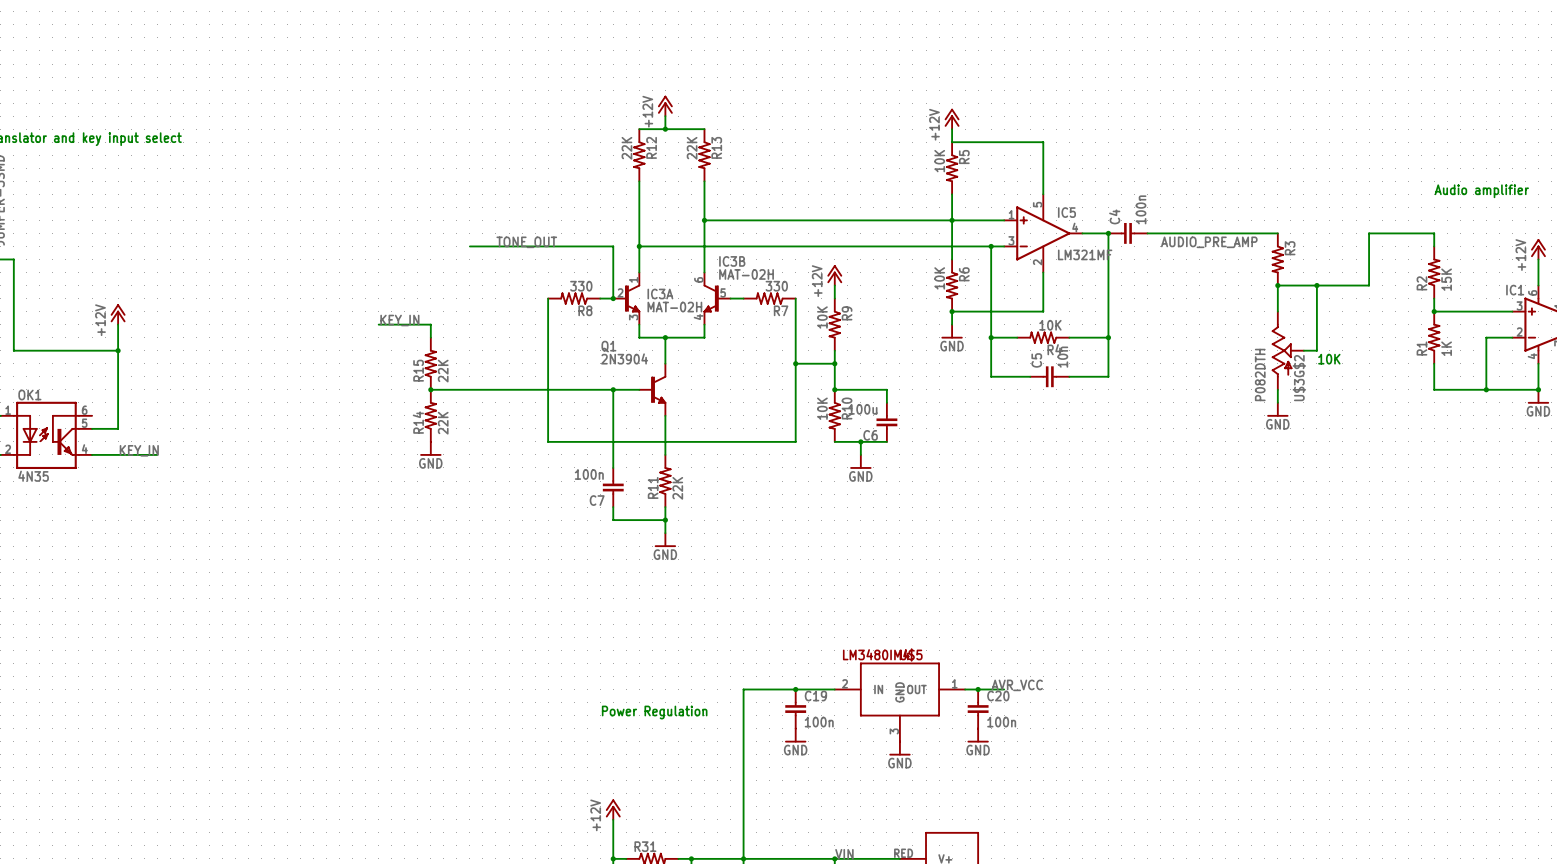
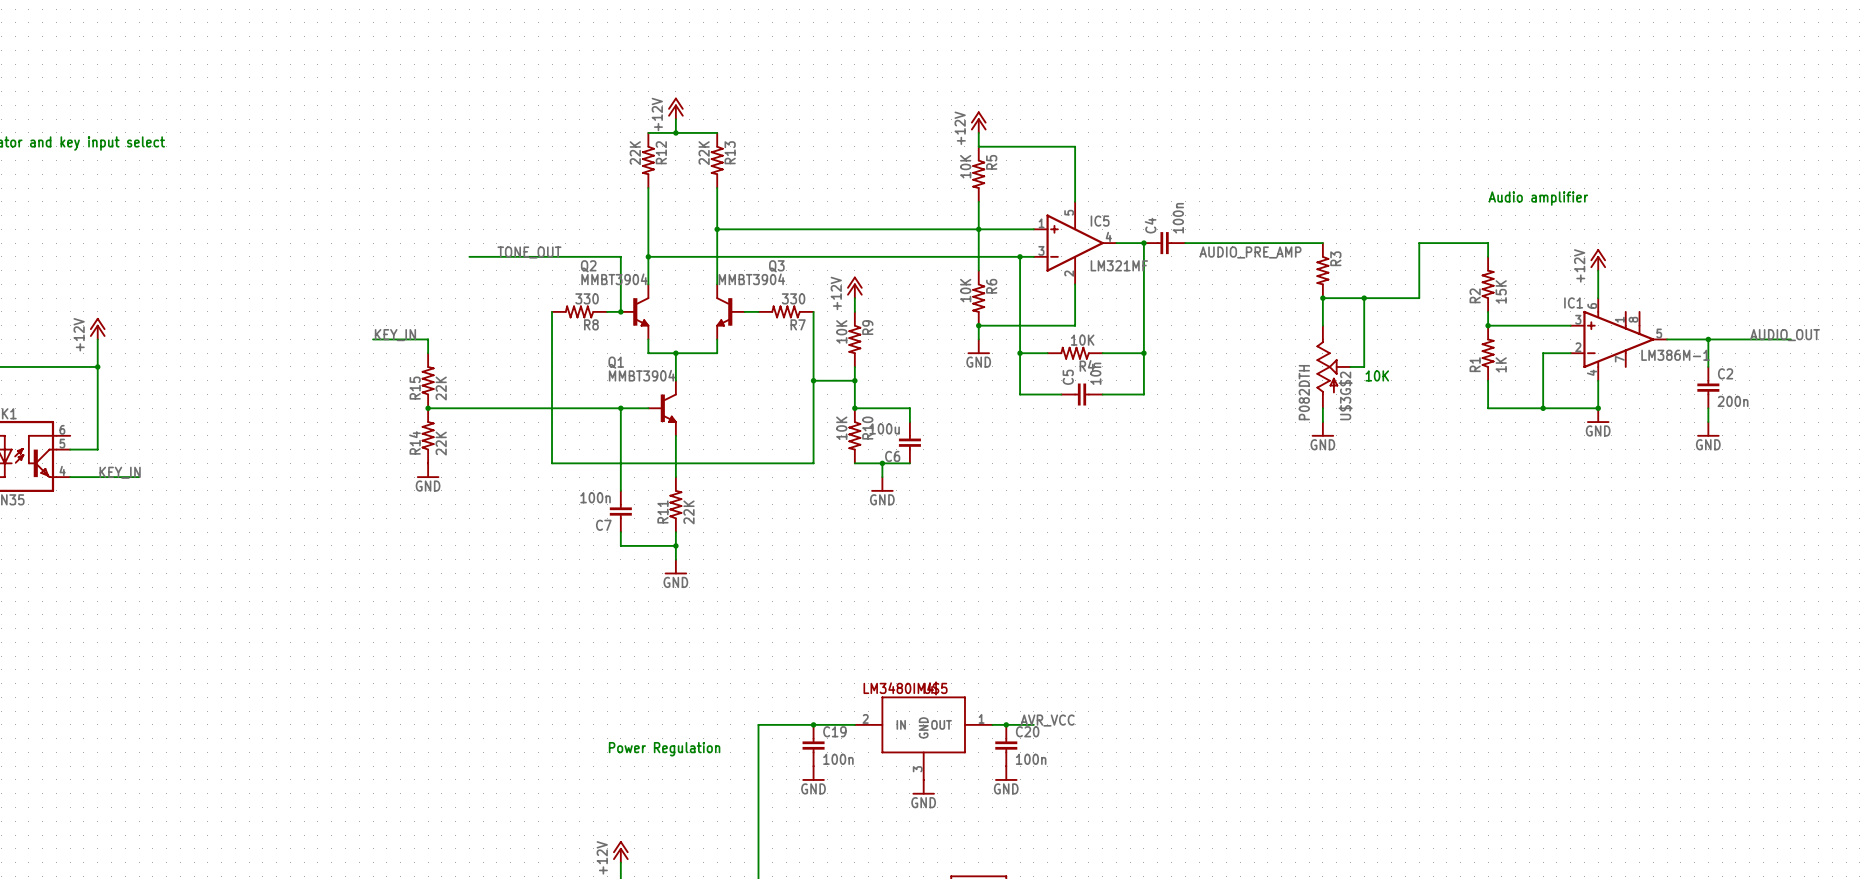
IC3A: MAT-02H (626, 298) -> none
Q2: none -> MMBT3904 (634, 311)
IC3B: MAT-02H (717, 298) -> none
Q3: none -> MMBT3904 (730, 311)
Q1 value: 2N3904 (624, 358) -> MMBT3904 (642, 375)

